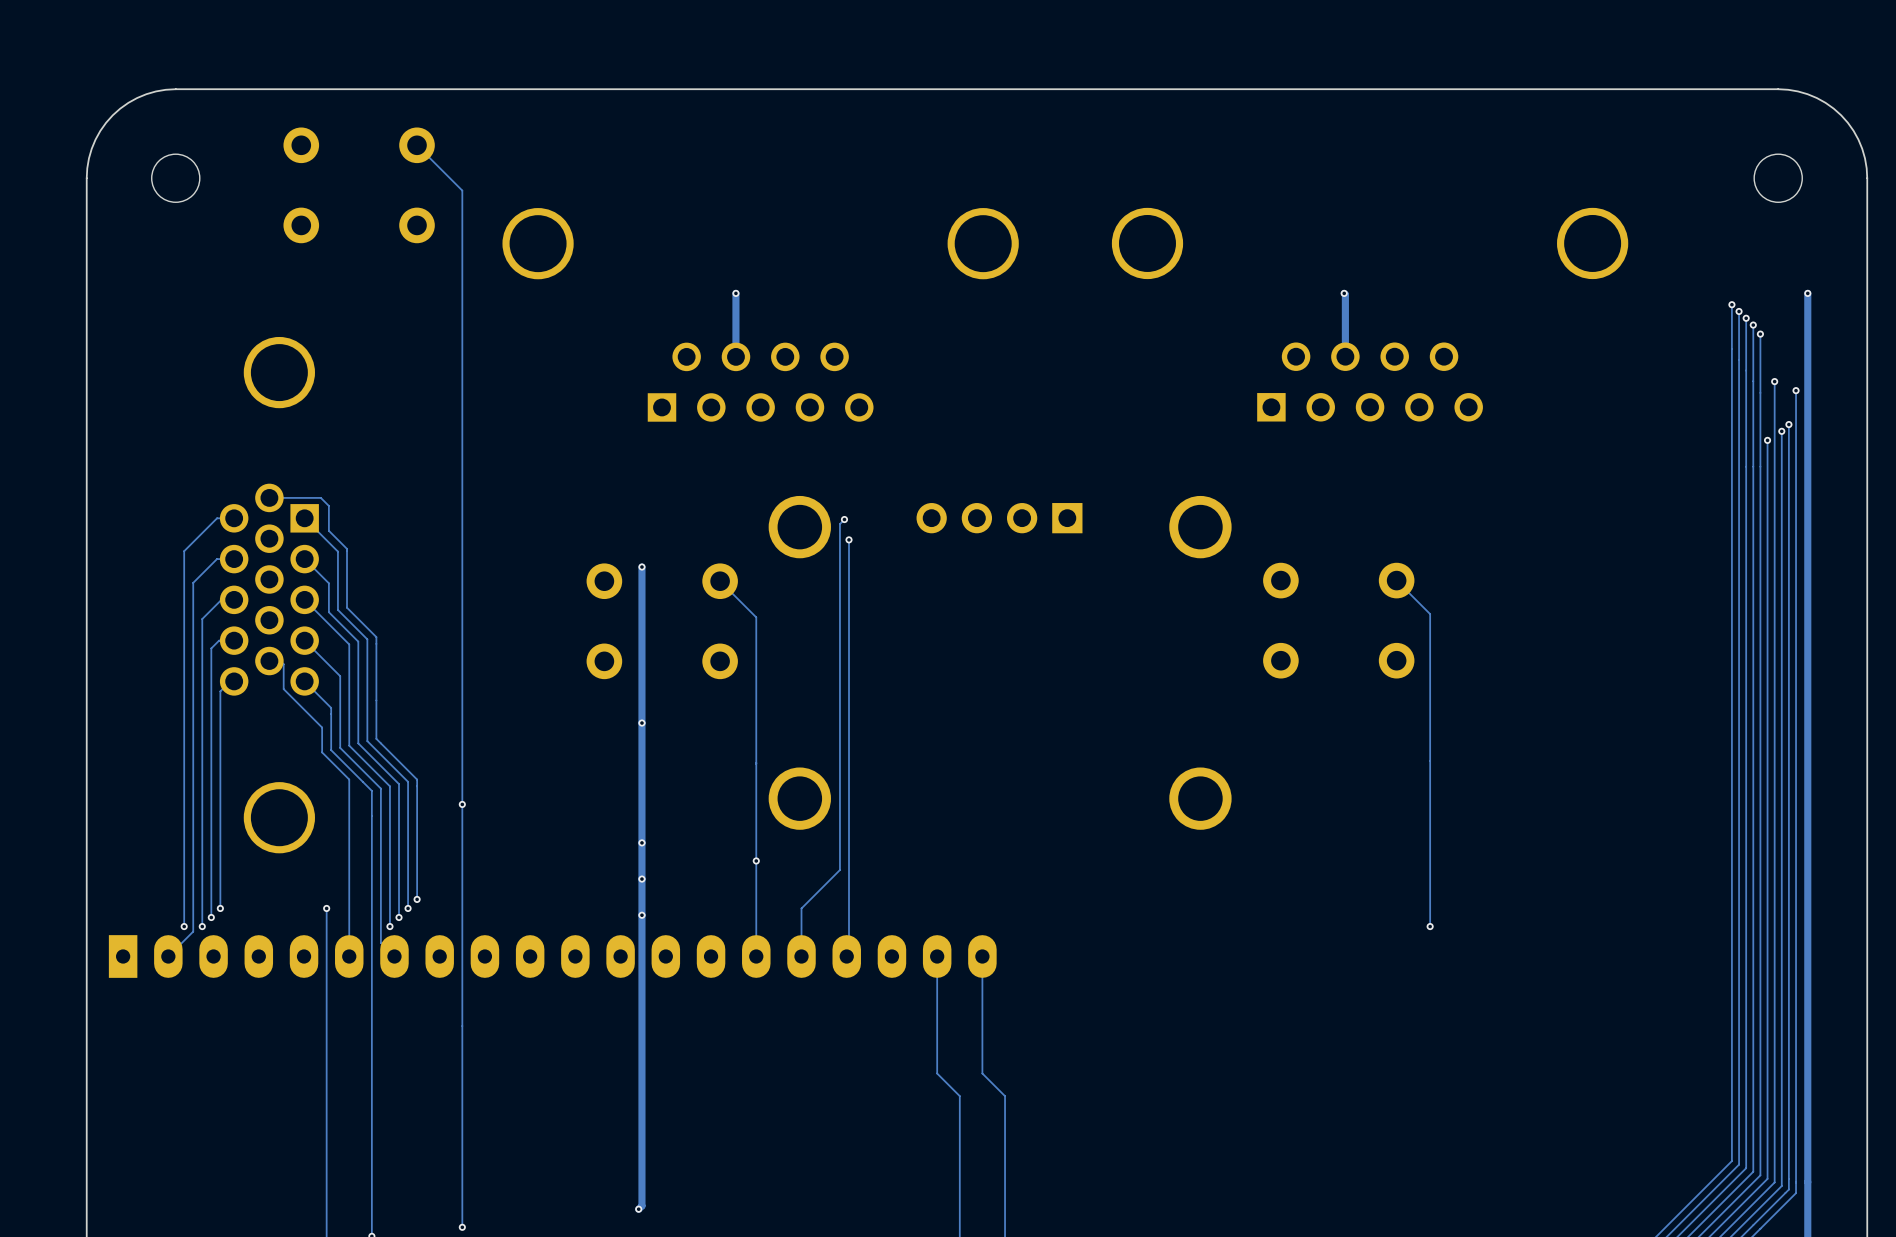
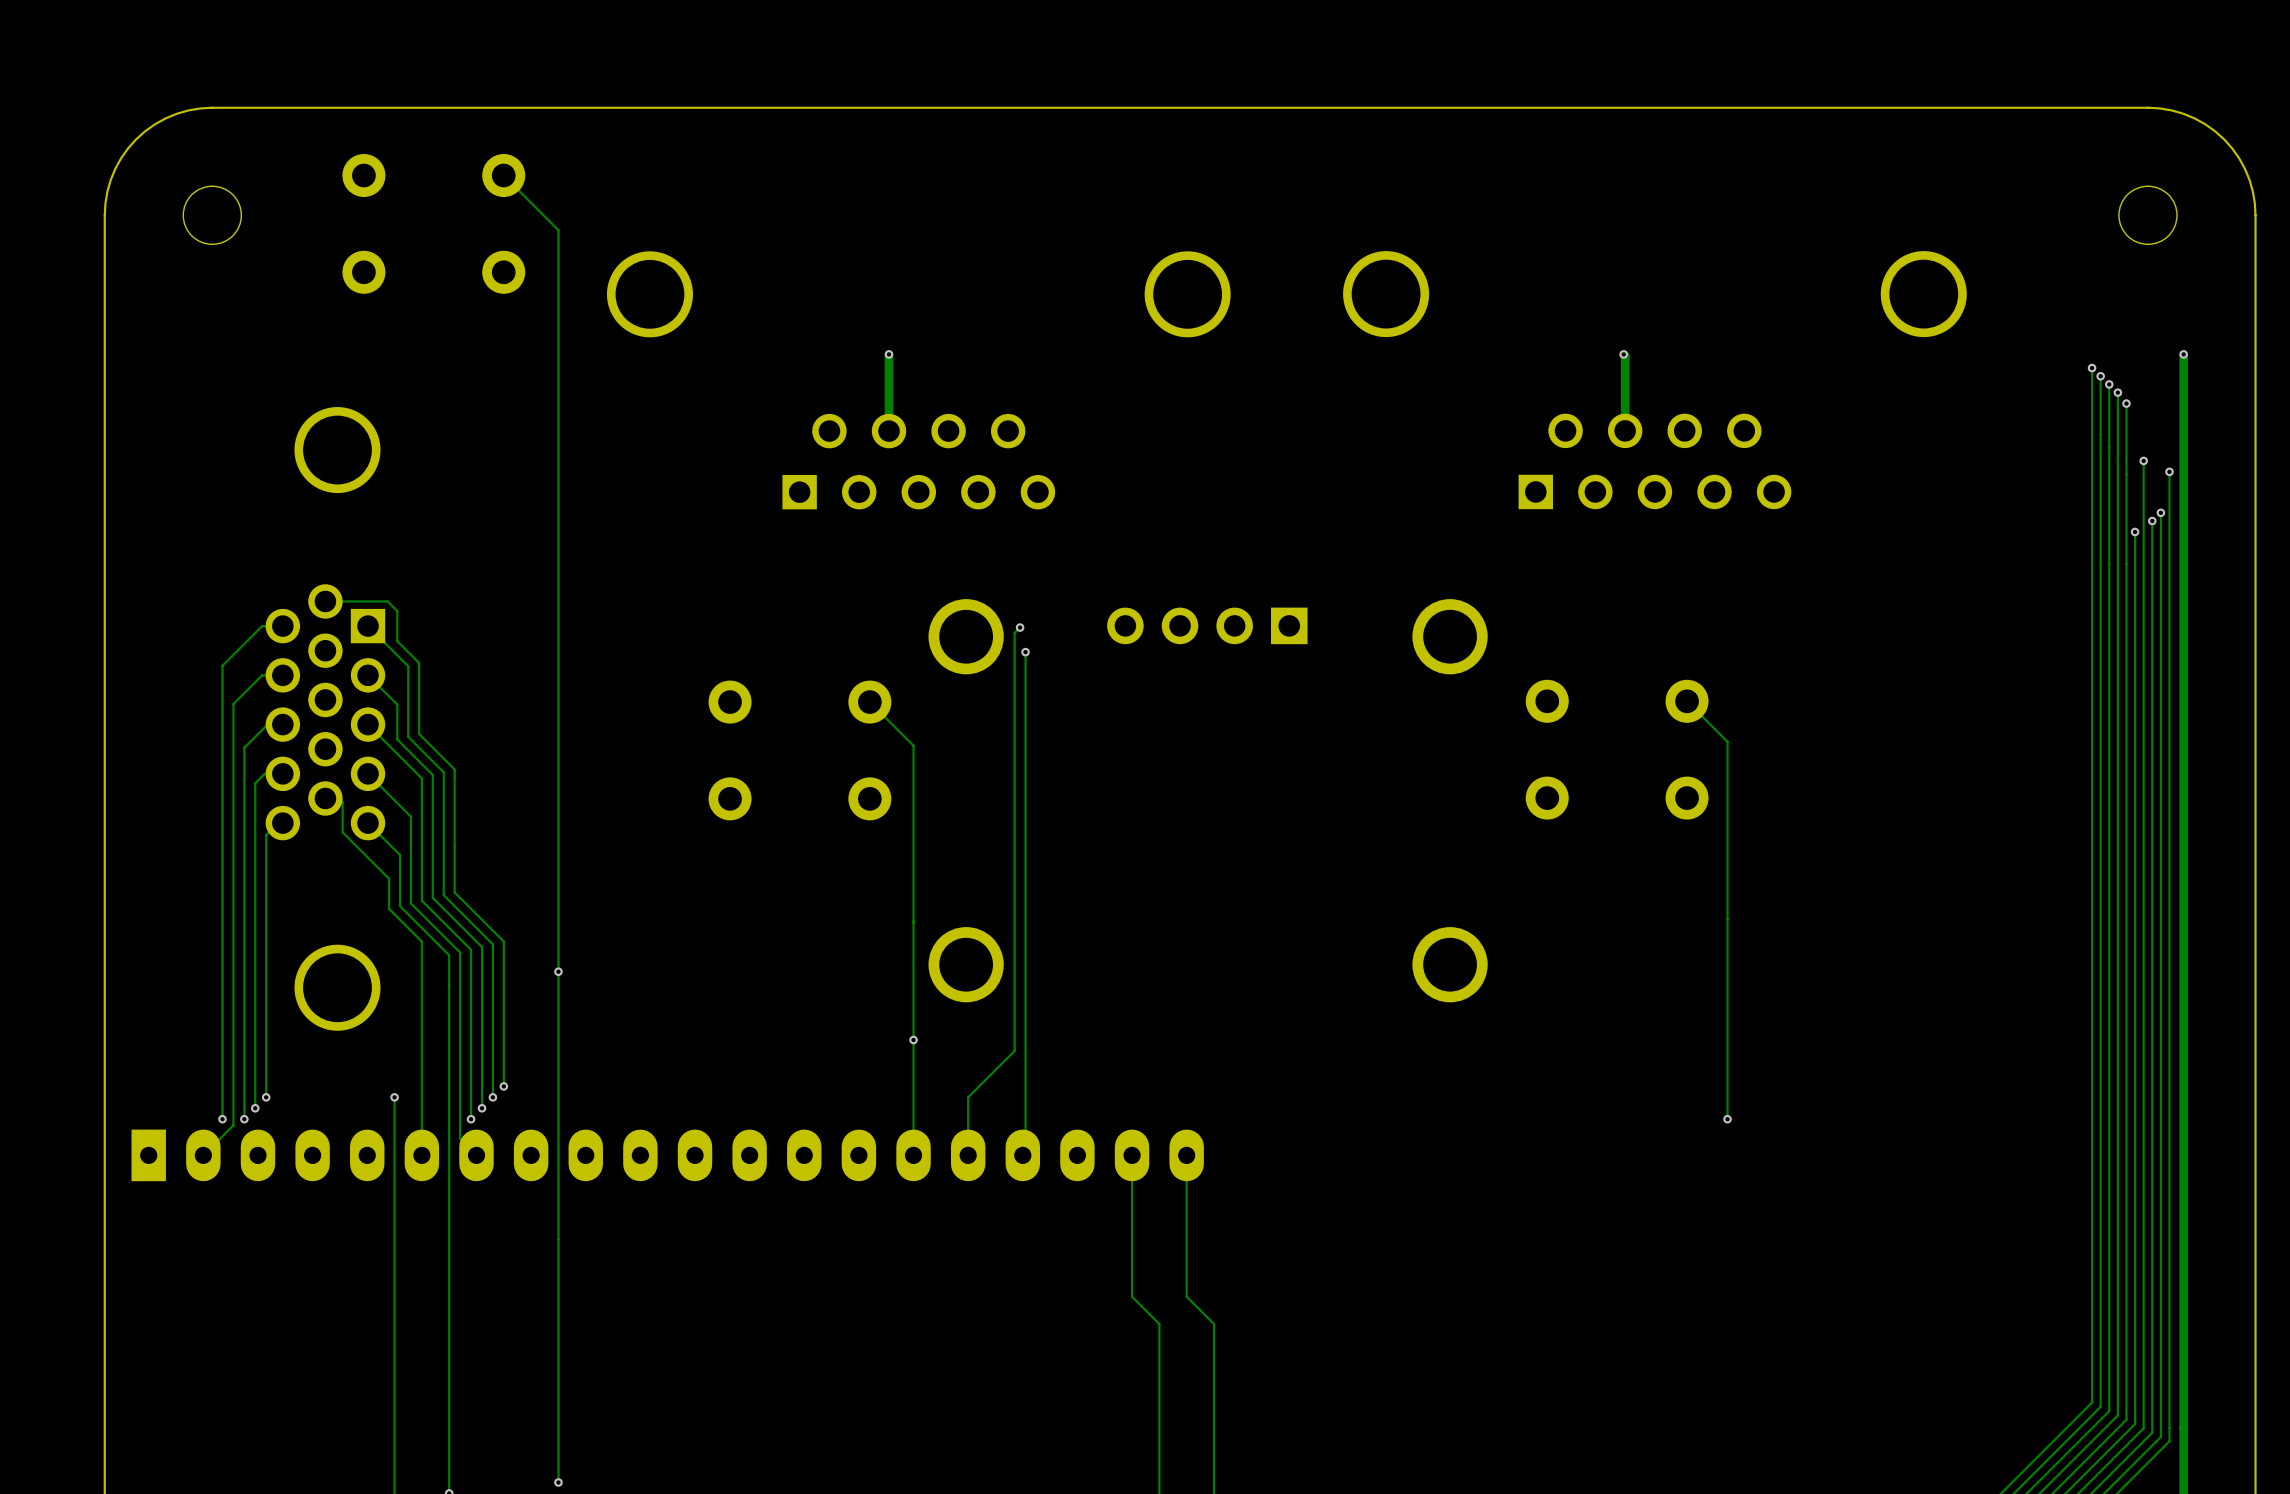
track: (641, 567) (641, 1205) (638, 1209) -> none
via: (641, 567) -> none
via: (641, 723) -> none
via: (641, 842) -> none
via: (641, 879) -> none
via: (641, 915) -> none
via: (638, 1209) -> none

